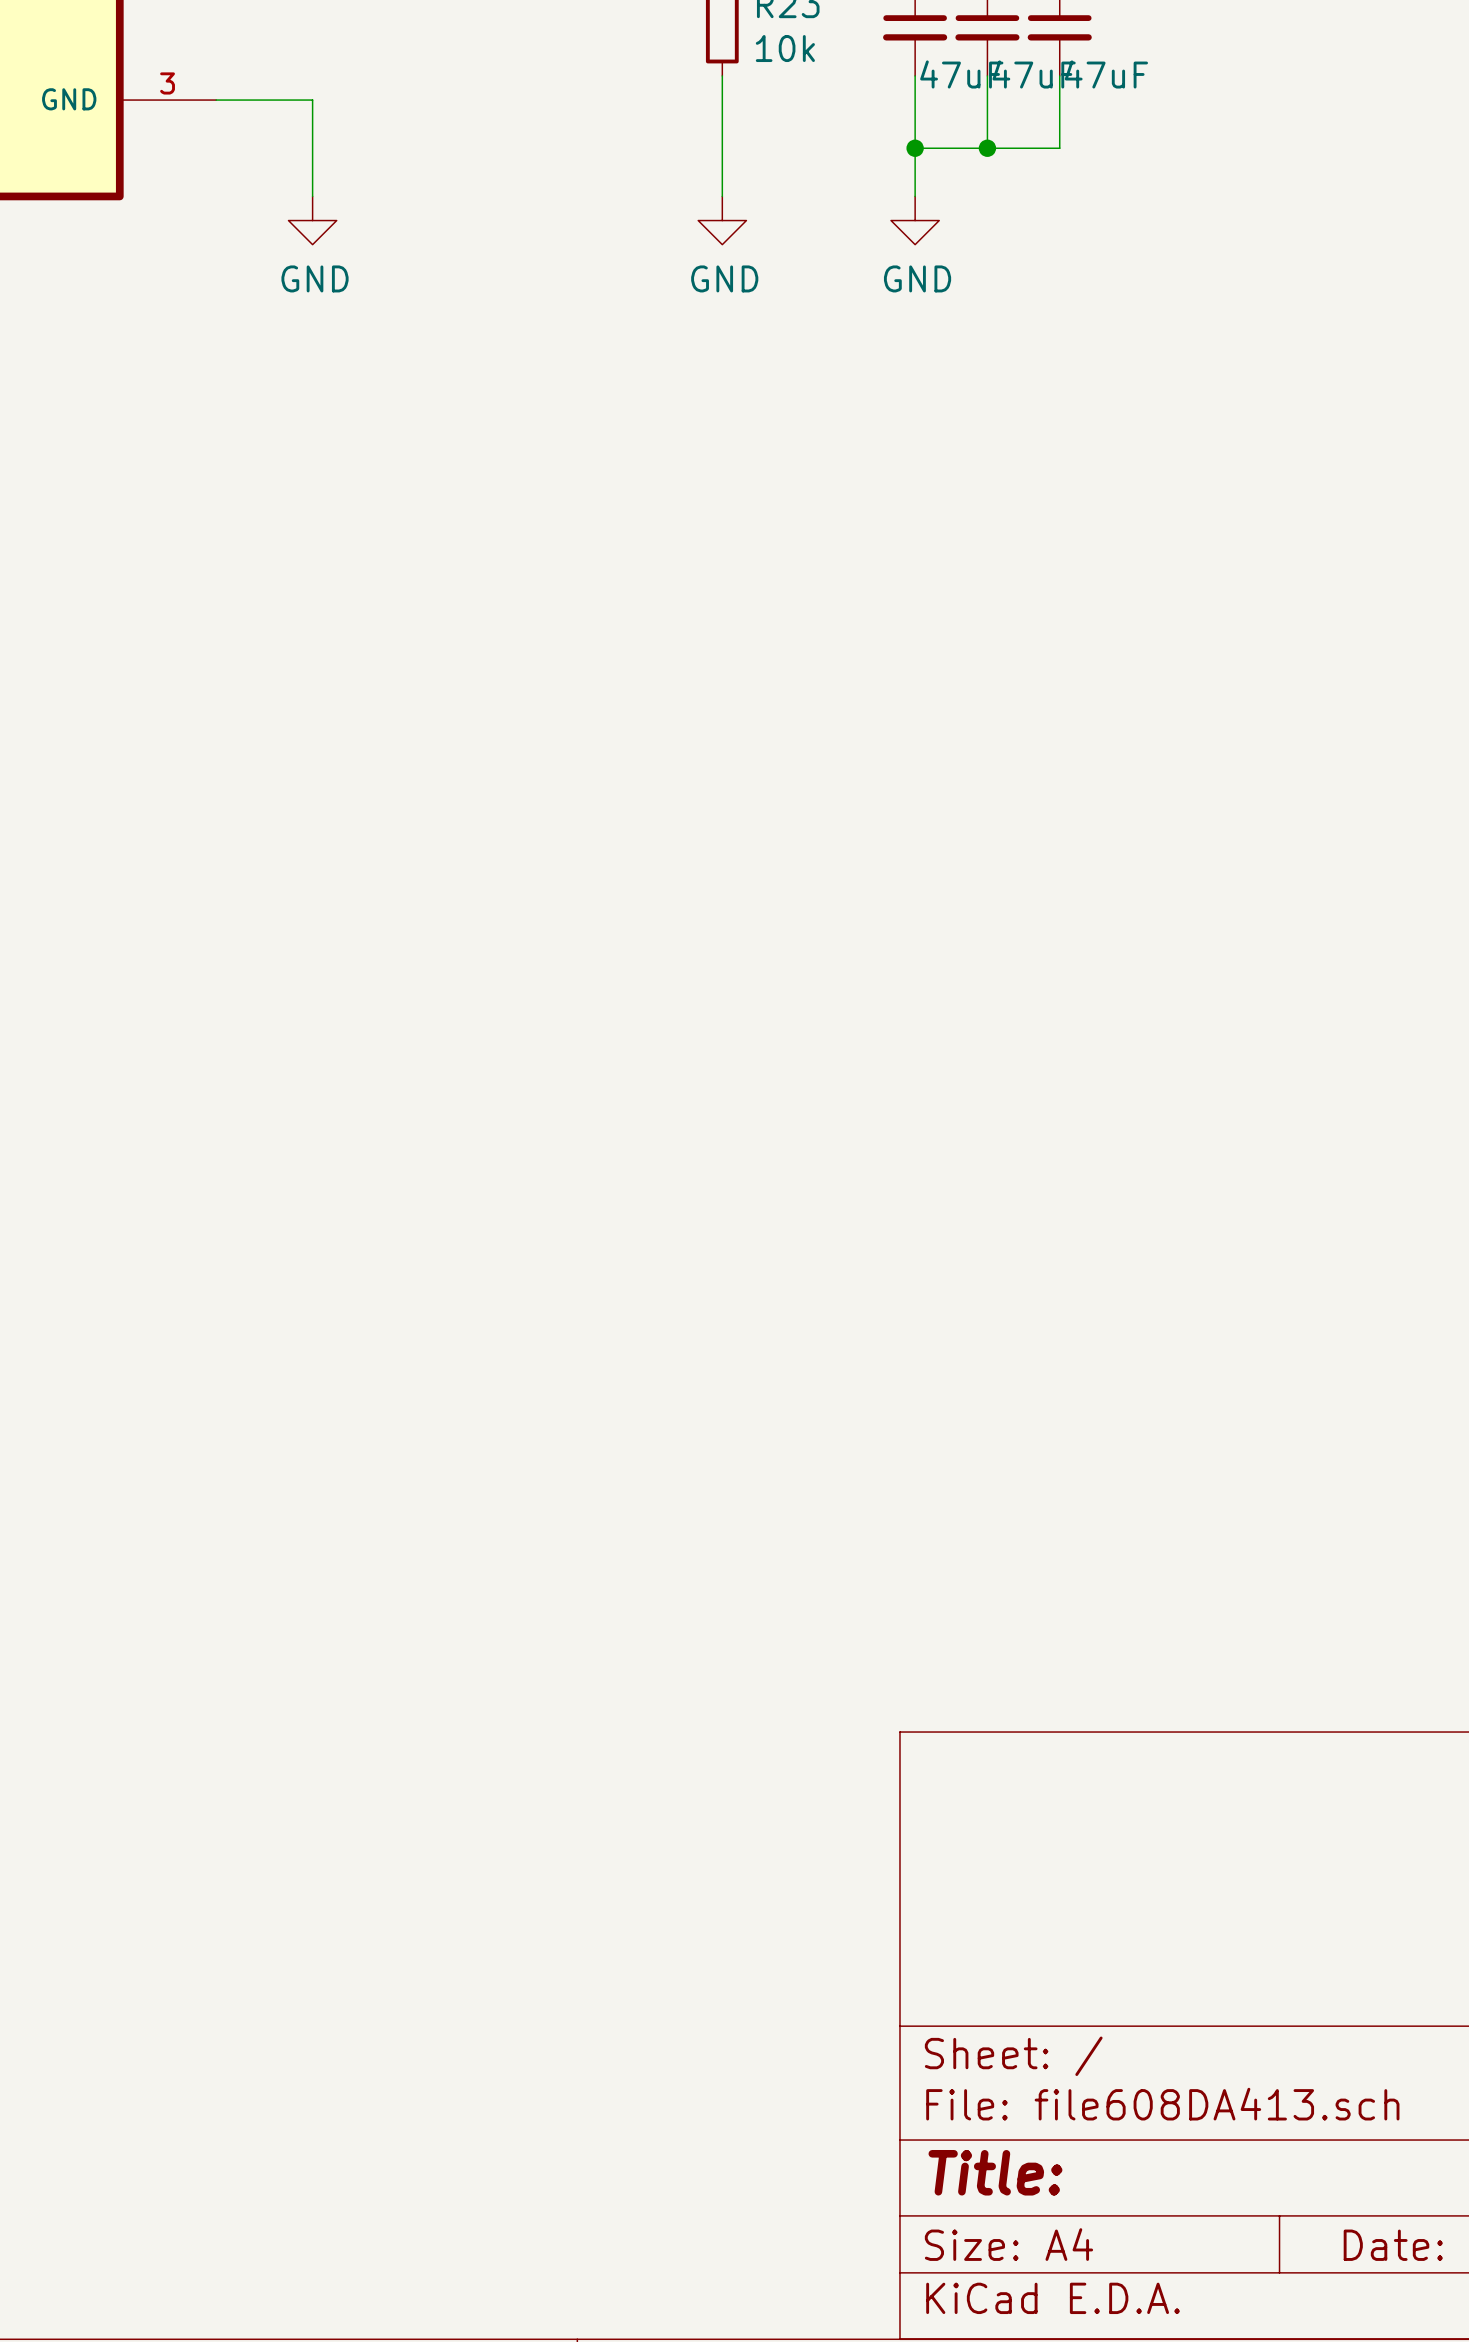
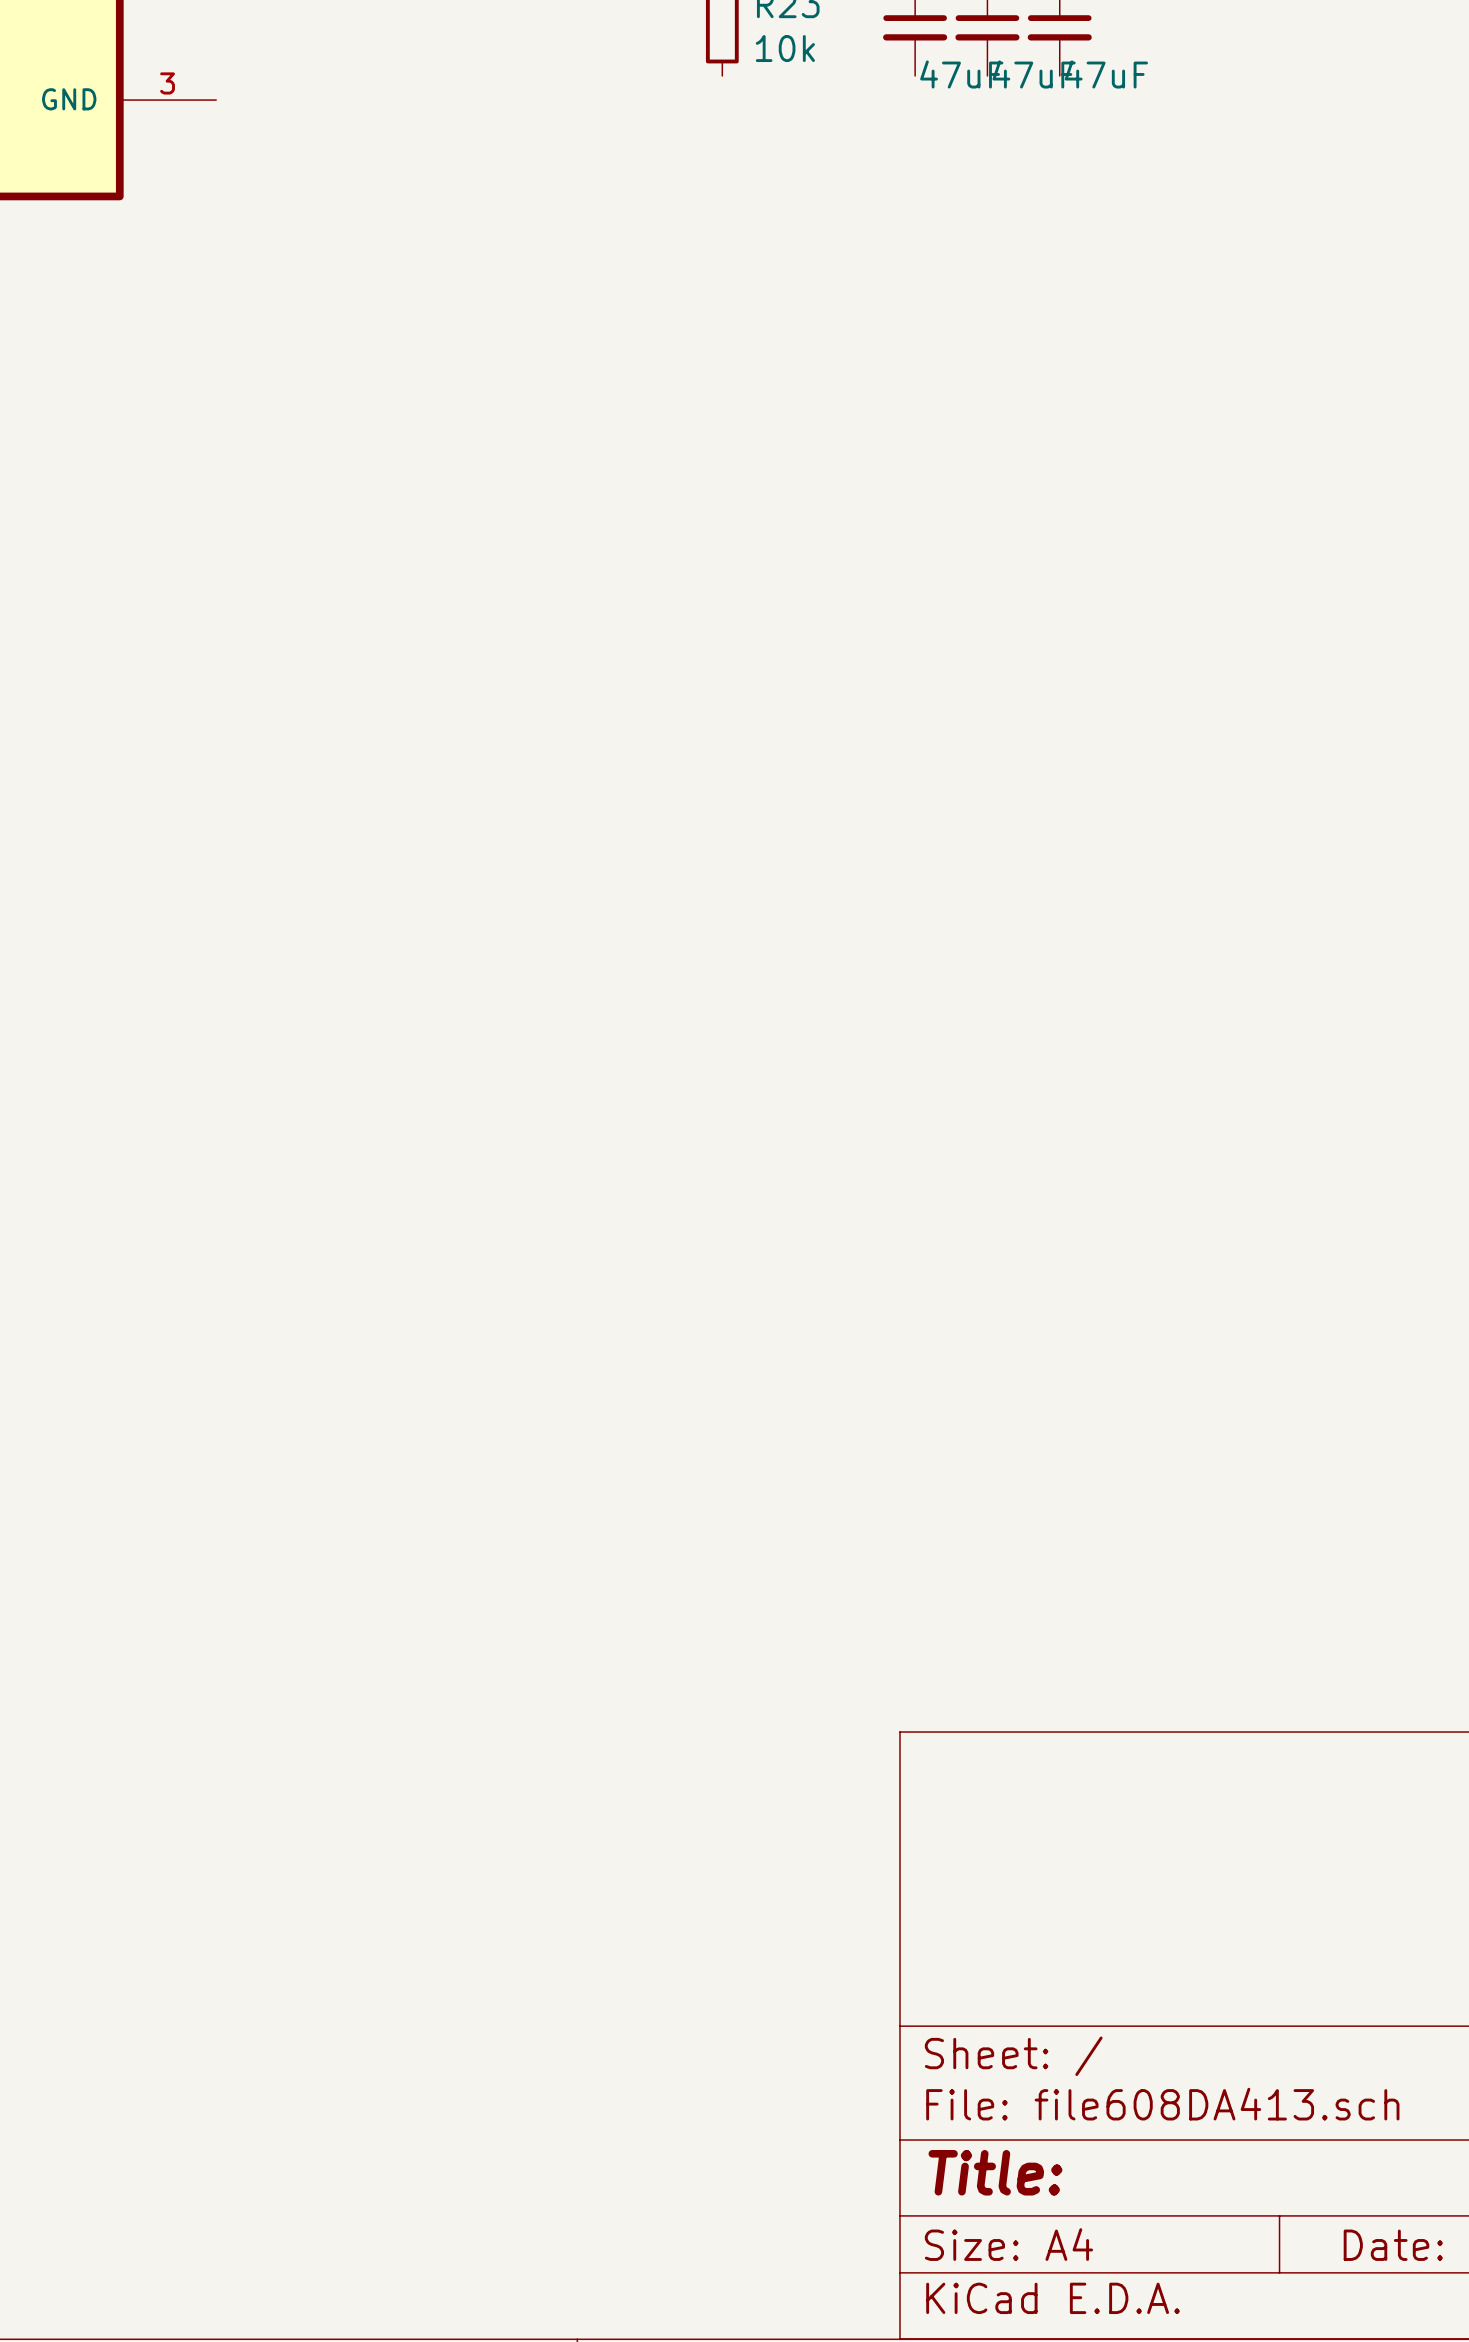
wire: (722, 75) (722, 196) -> none
wire: (915, 75) (915, 196) -> none
wire: (987, 75) (987, 148) -> none
wire: (1059, 75) (1059, 148) (915, 148) -> none
wire: (216, 100) (312, 100) (312, 196) -> none
junction: (915, 148) -> none
junction: (987, 148) -> none
power symbol: GND (312, 220) -> none
power symbol: GND (722, 220) -> none
power symbol: GND (915, 220) -> none

